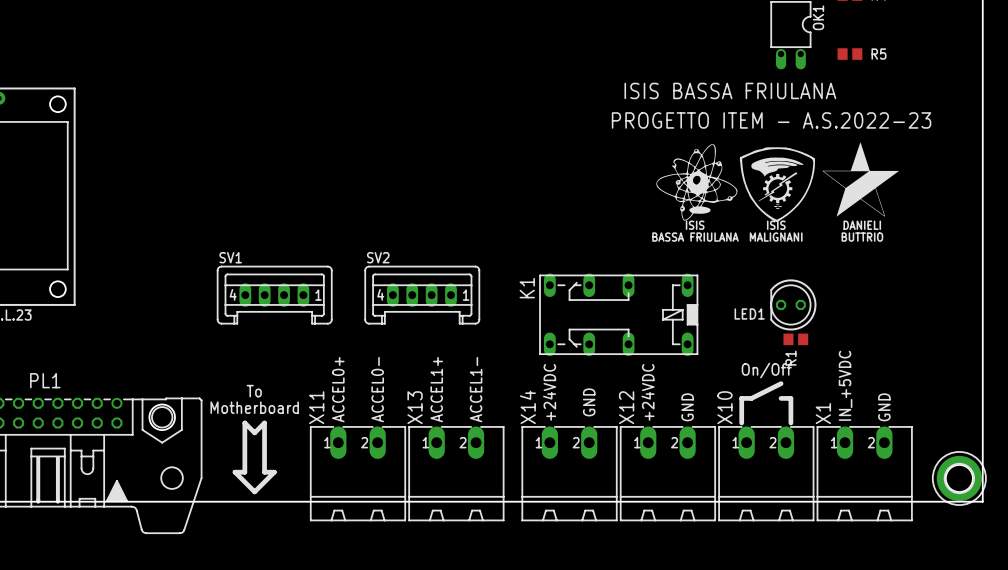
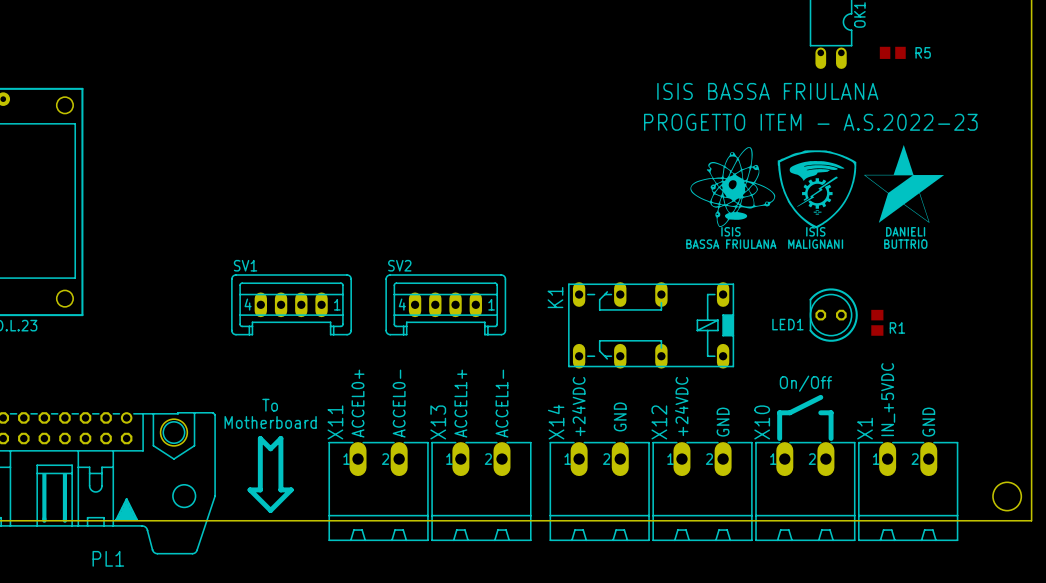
R1 rotation: 0° (795, 339) -> 90° clockwise (877, 322)
R1 position: (795, 339) -> (877, 322)
R1 name position: R1 (790, 358) -> R1 (897, 327)
PL1 name position: PL1 (45, 380) -> PL1 (108, 558)
part: (959, 478) -> none

